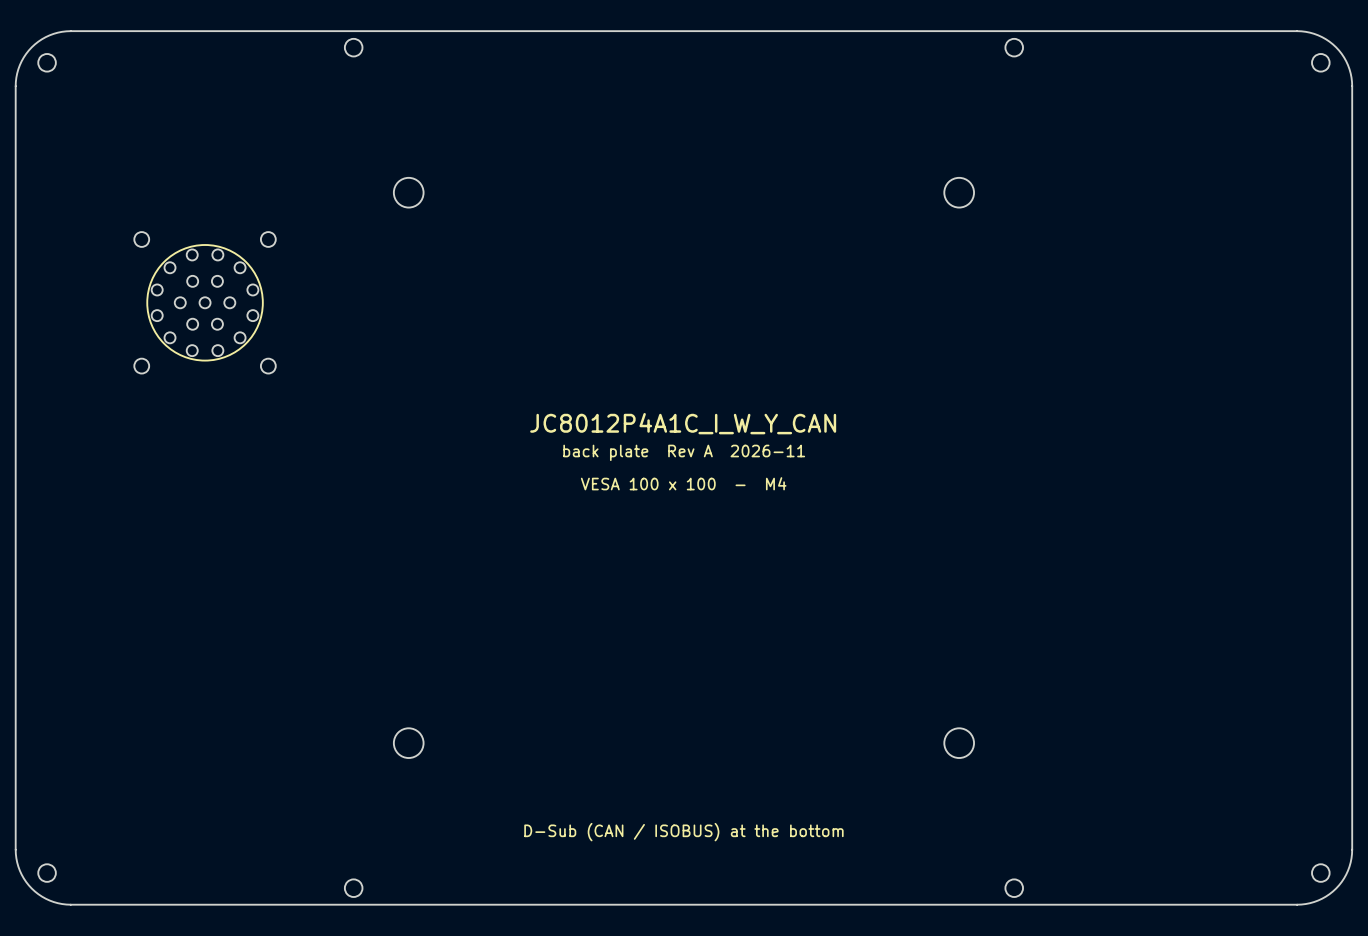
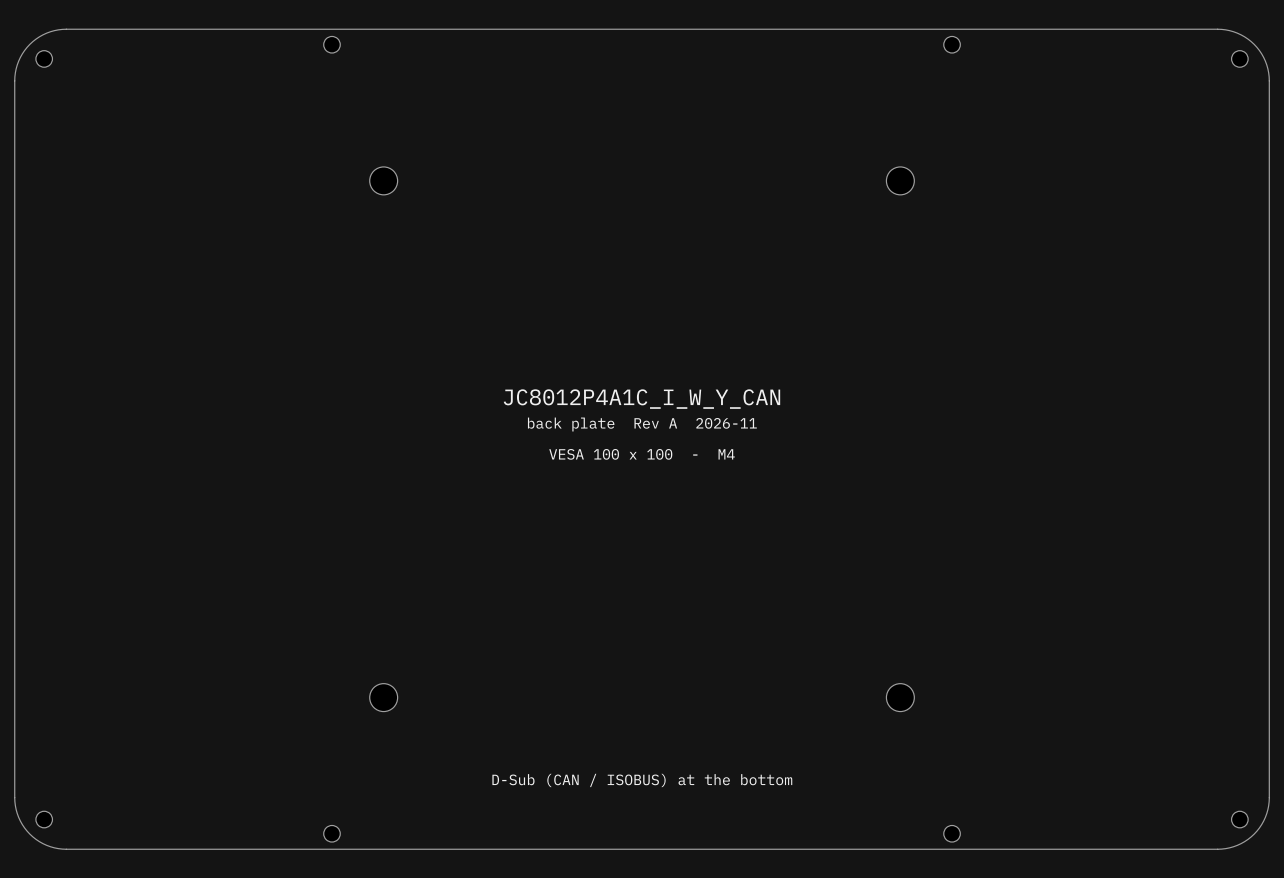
part: (205, 302) -> none

